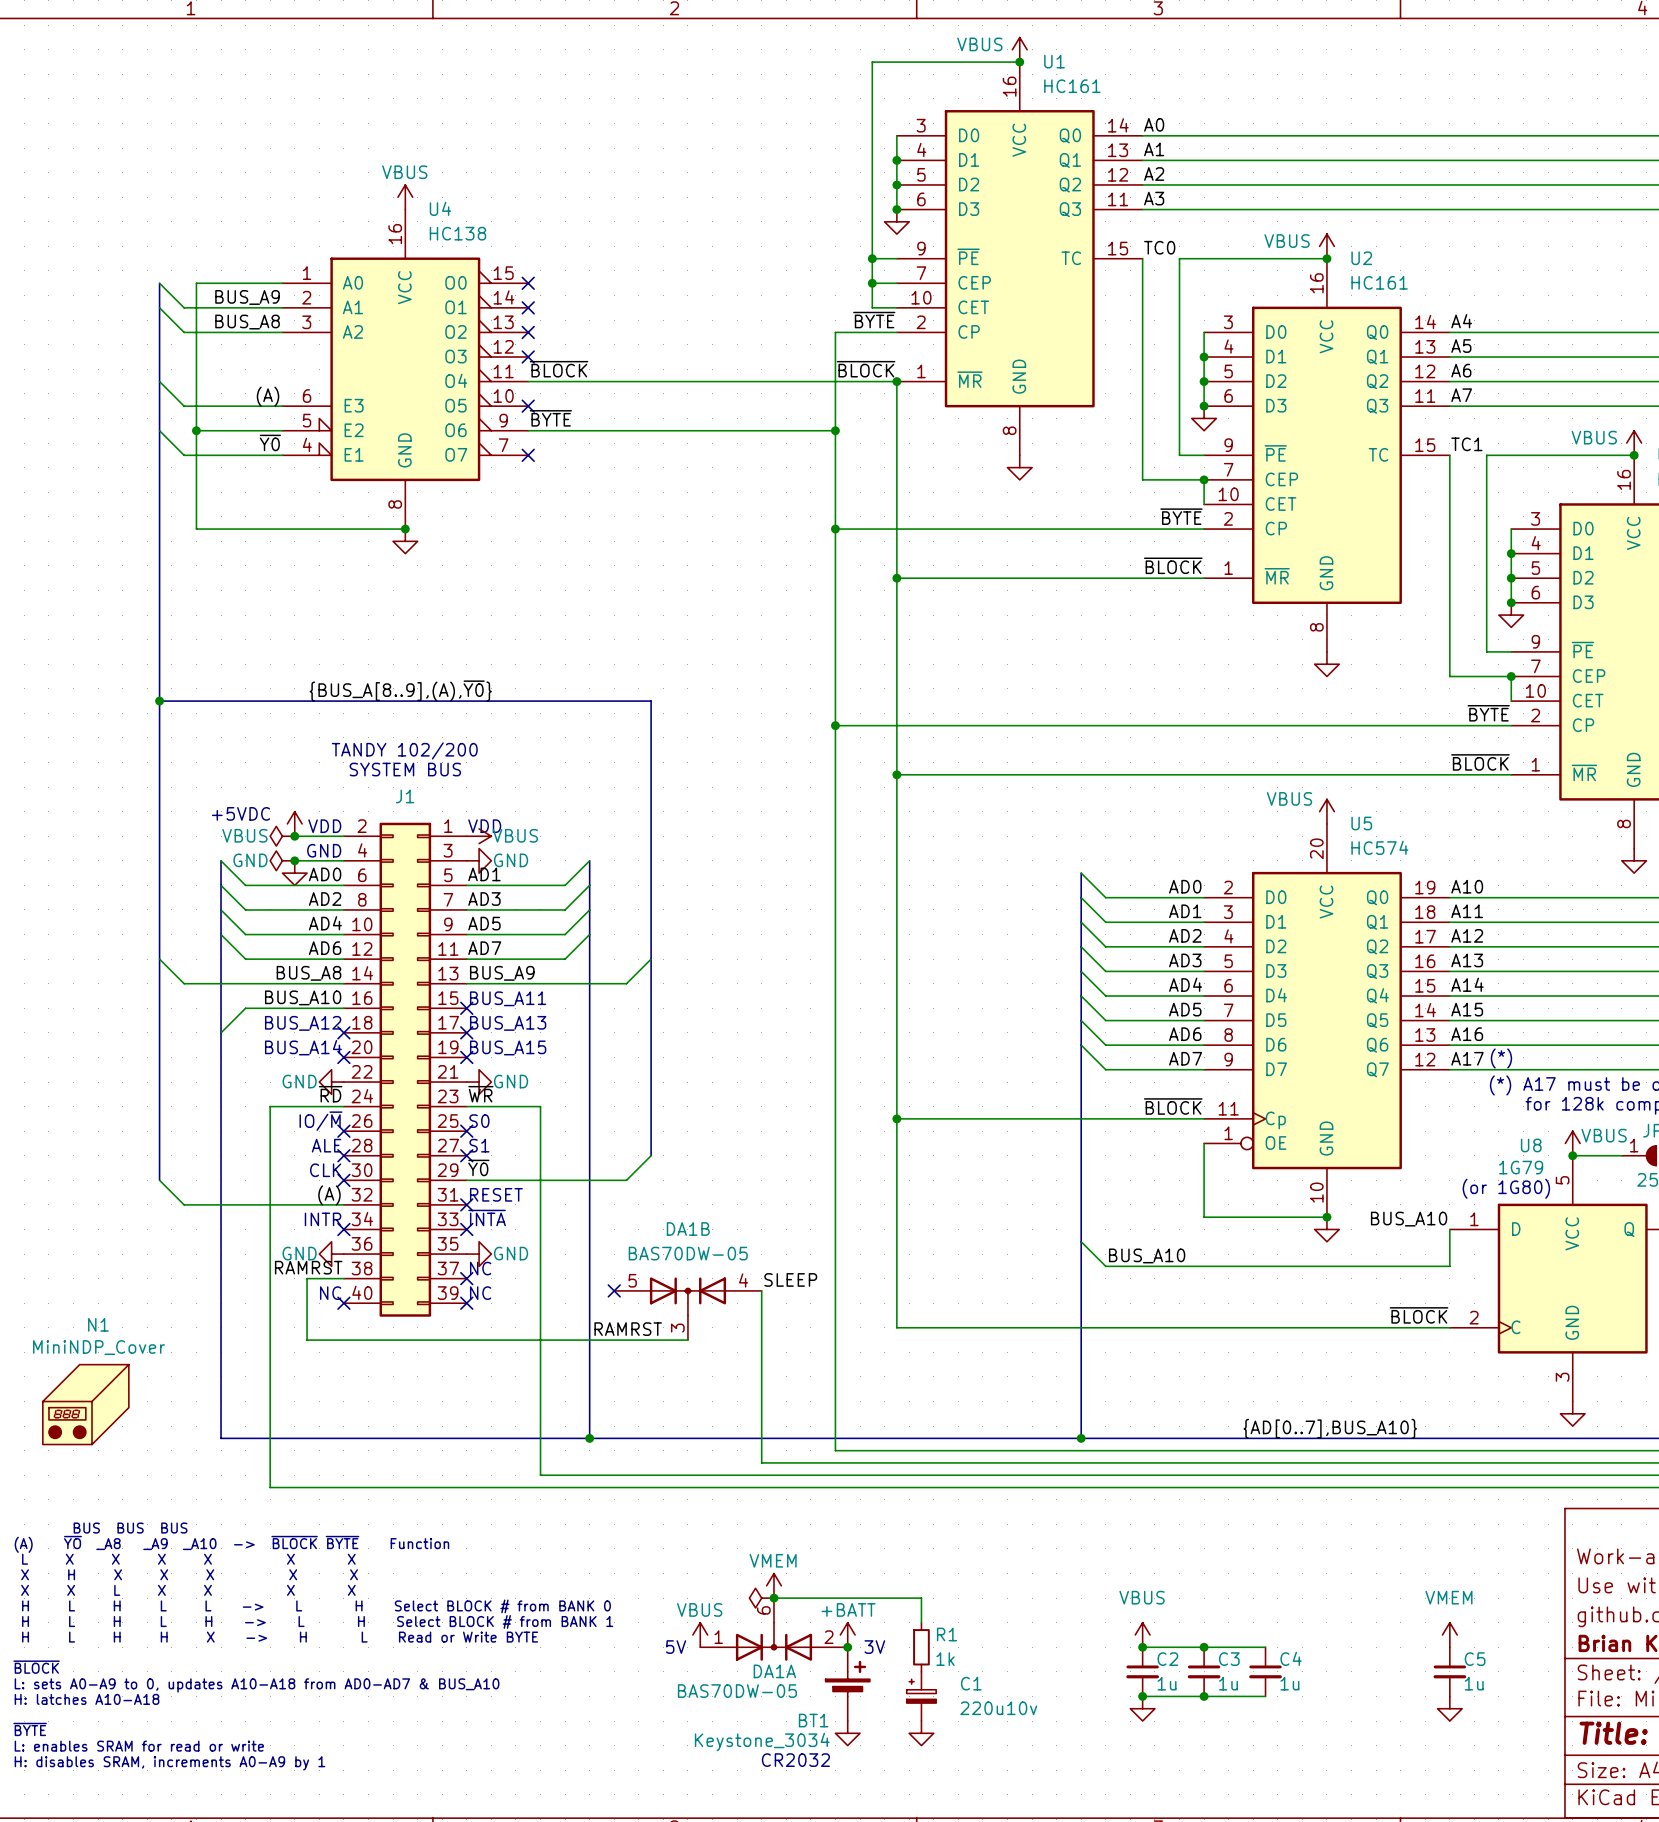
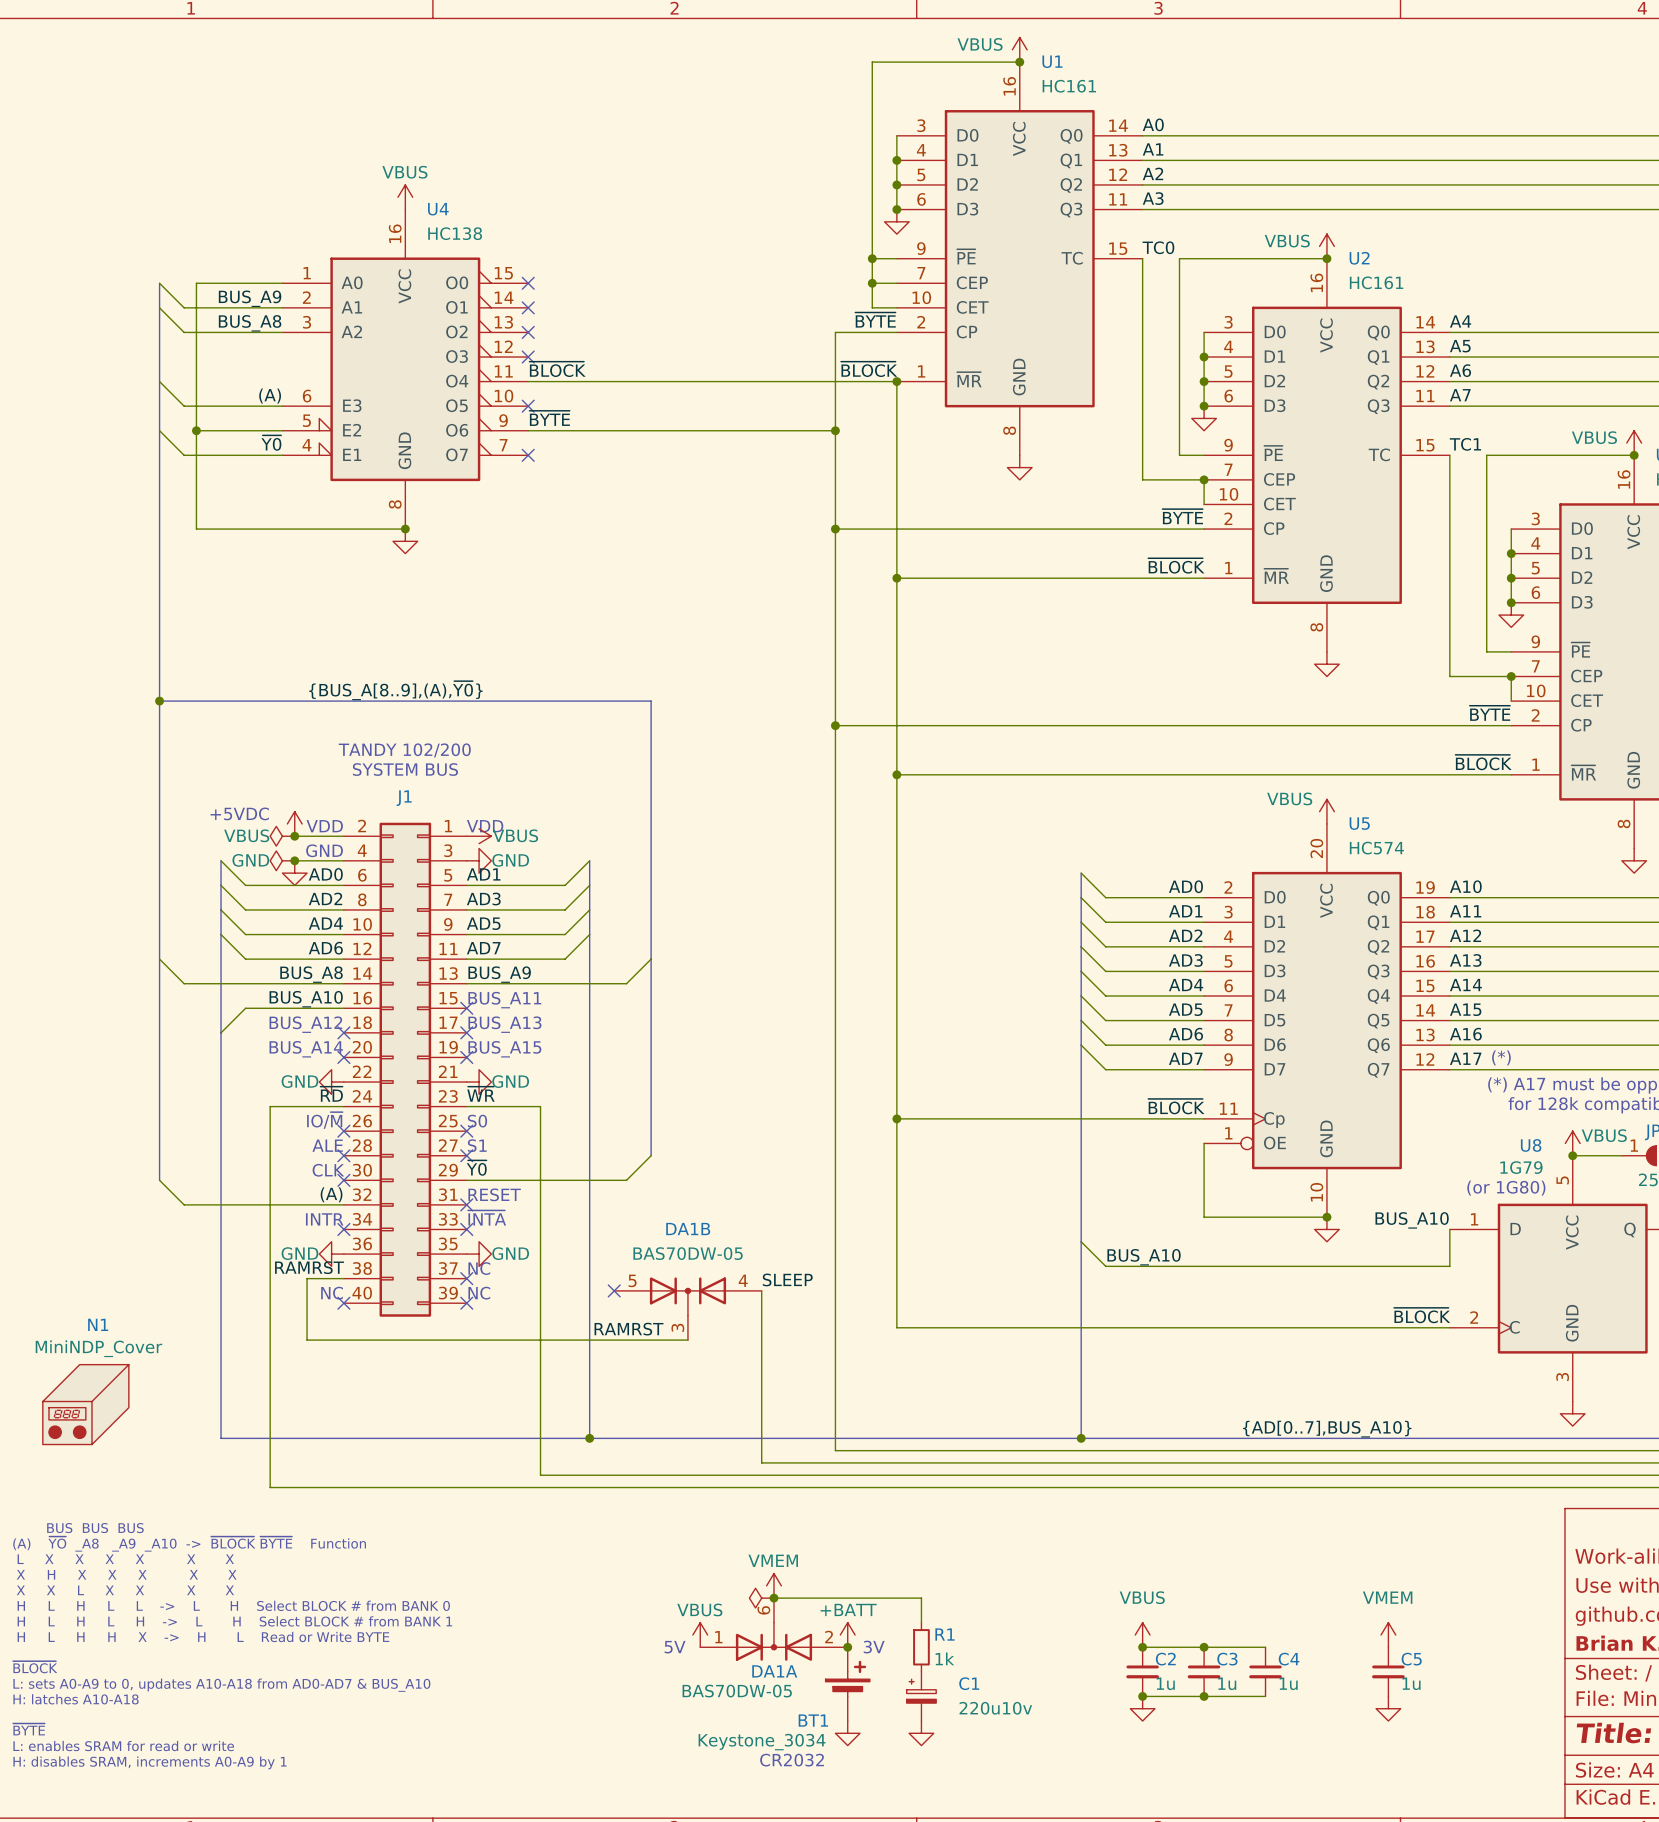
power symbol position: VMEM (1449, 1634) -> VMEM (1388, 1634)
C5 position: (1449, 1671) -> (1388, 1671)
power symbol position: (1449, 1708) -> (1388, 1708)

